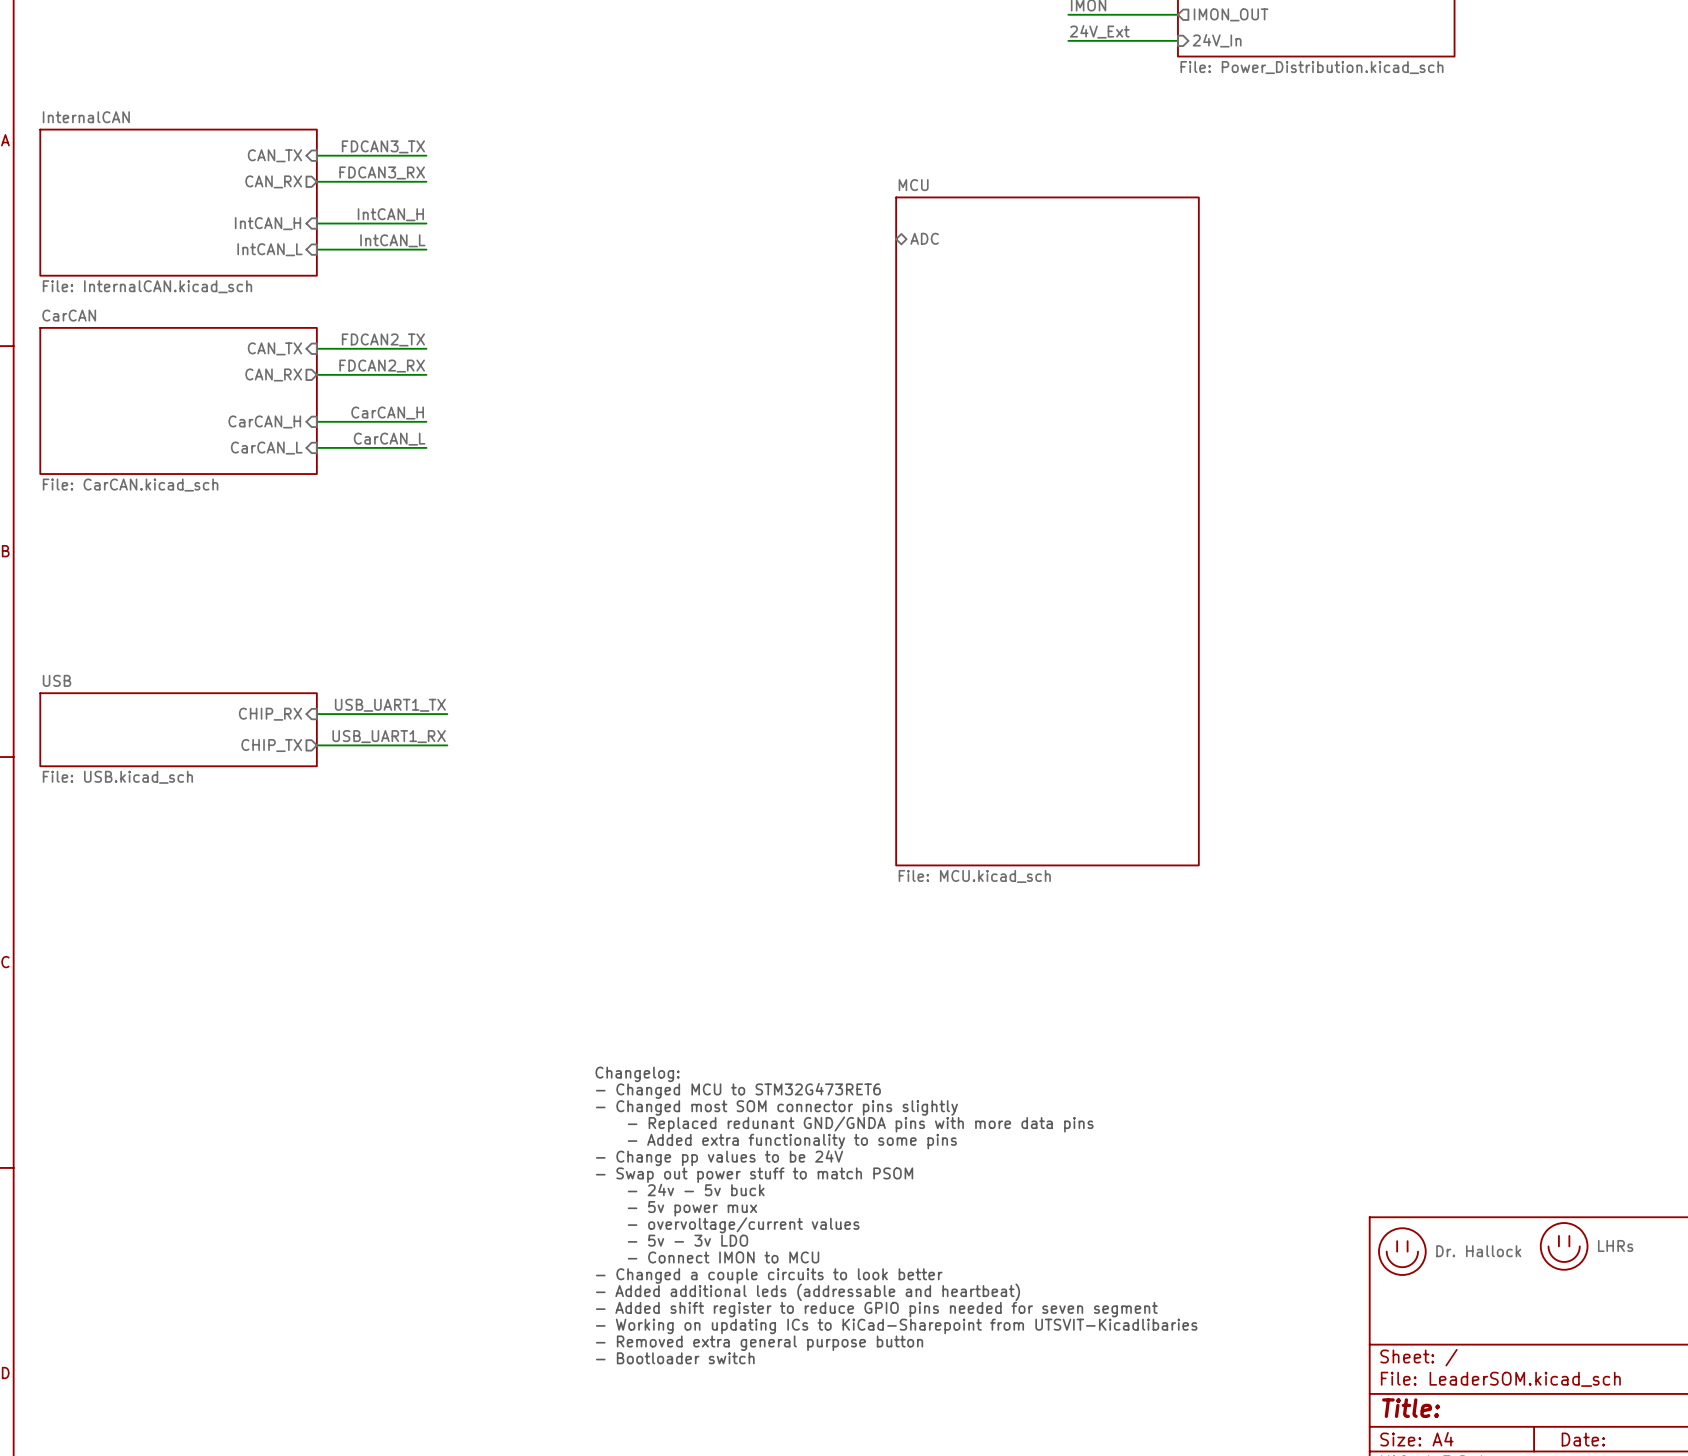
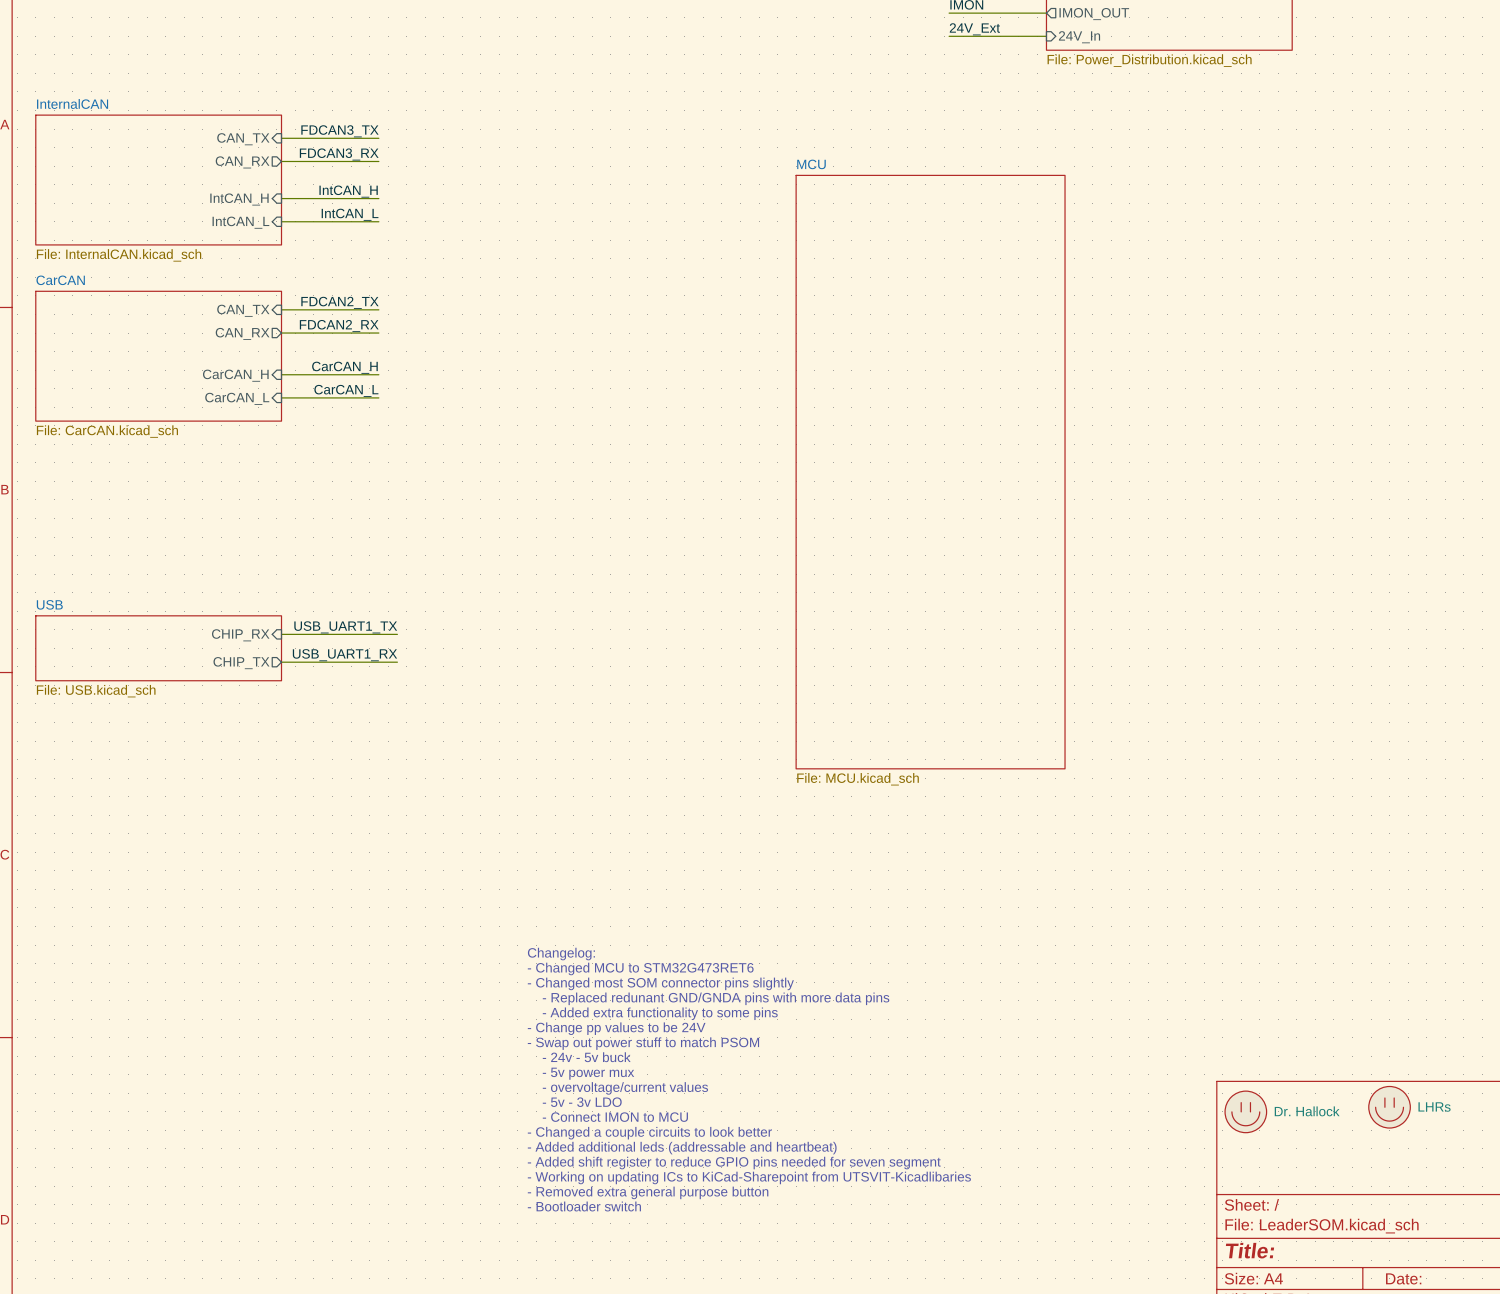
sheet pin: ADC (924, 238) -> none

